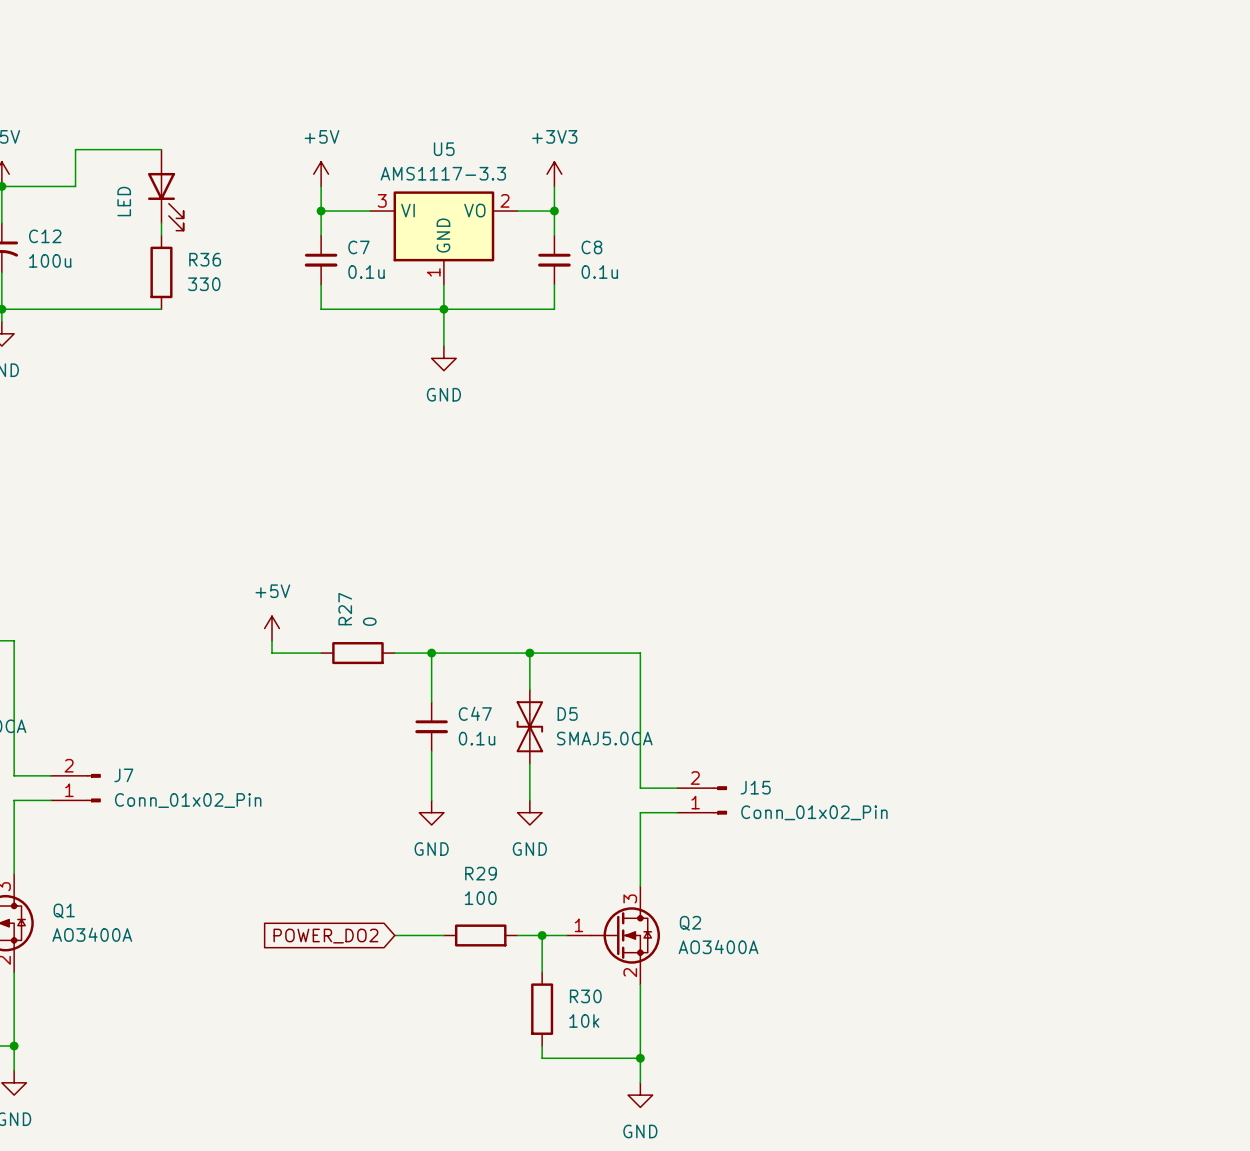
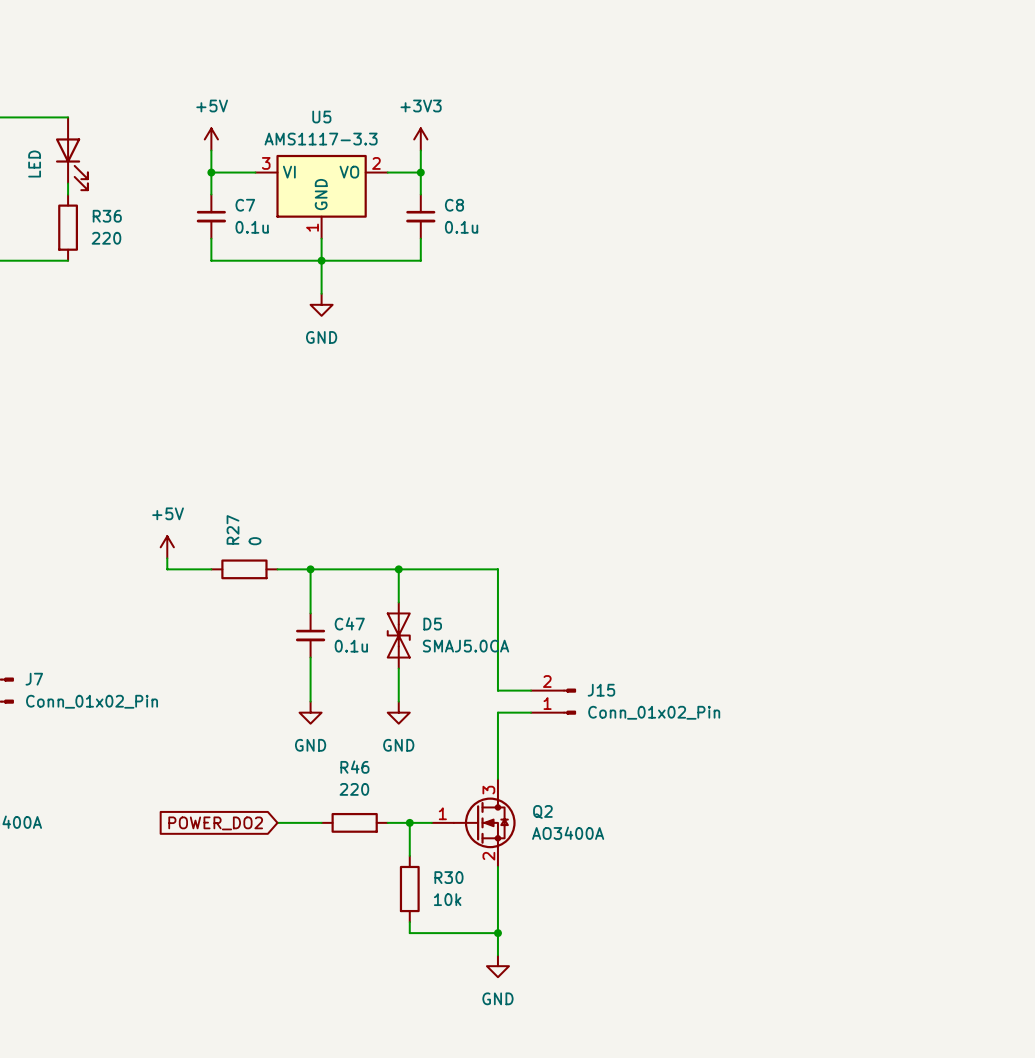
R36 value: 330 (204, 284) -> 220 (106, 238)
R29 name: R29 (481, 873) -> R46 (354, 767)
R29 value: 100 (480, 898) -> 220 (354, 789)

